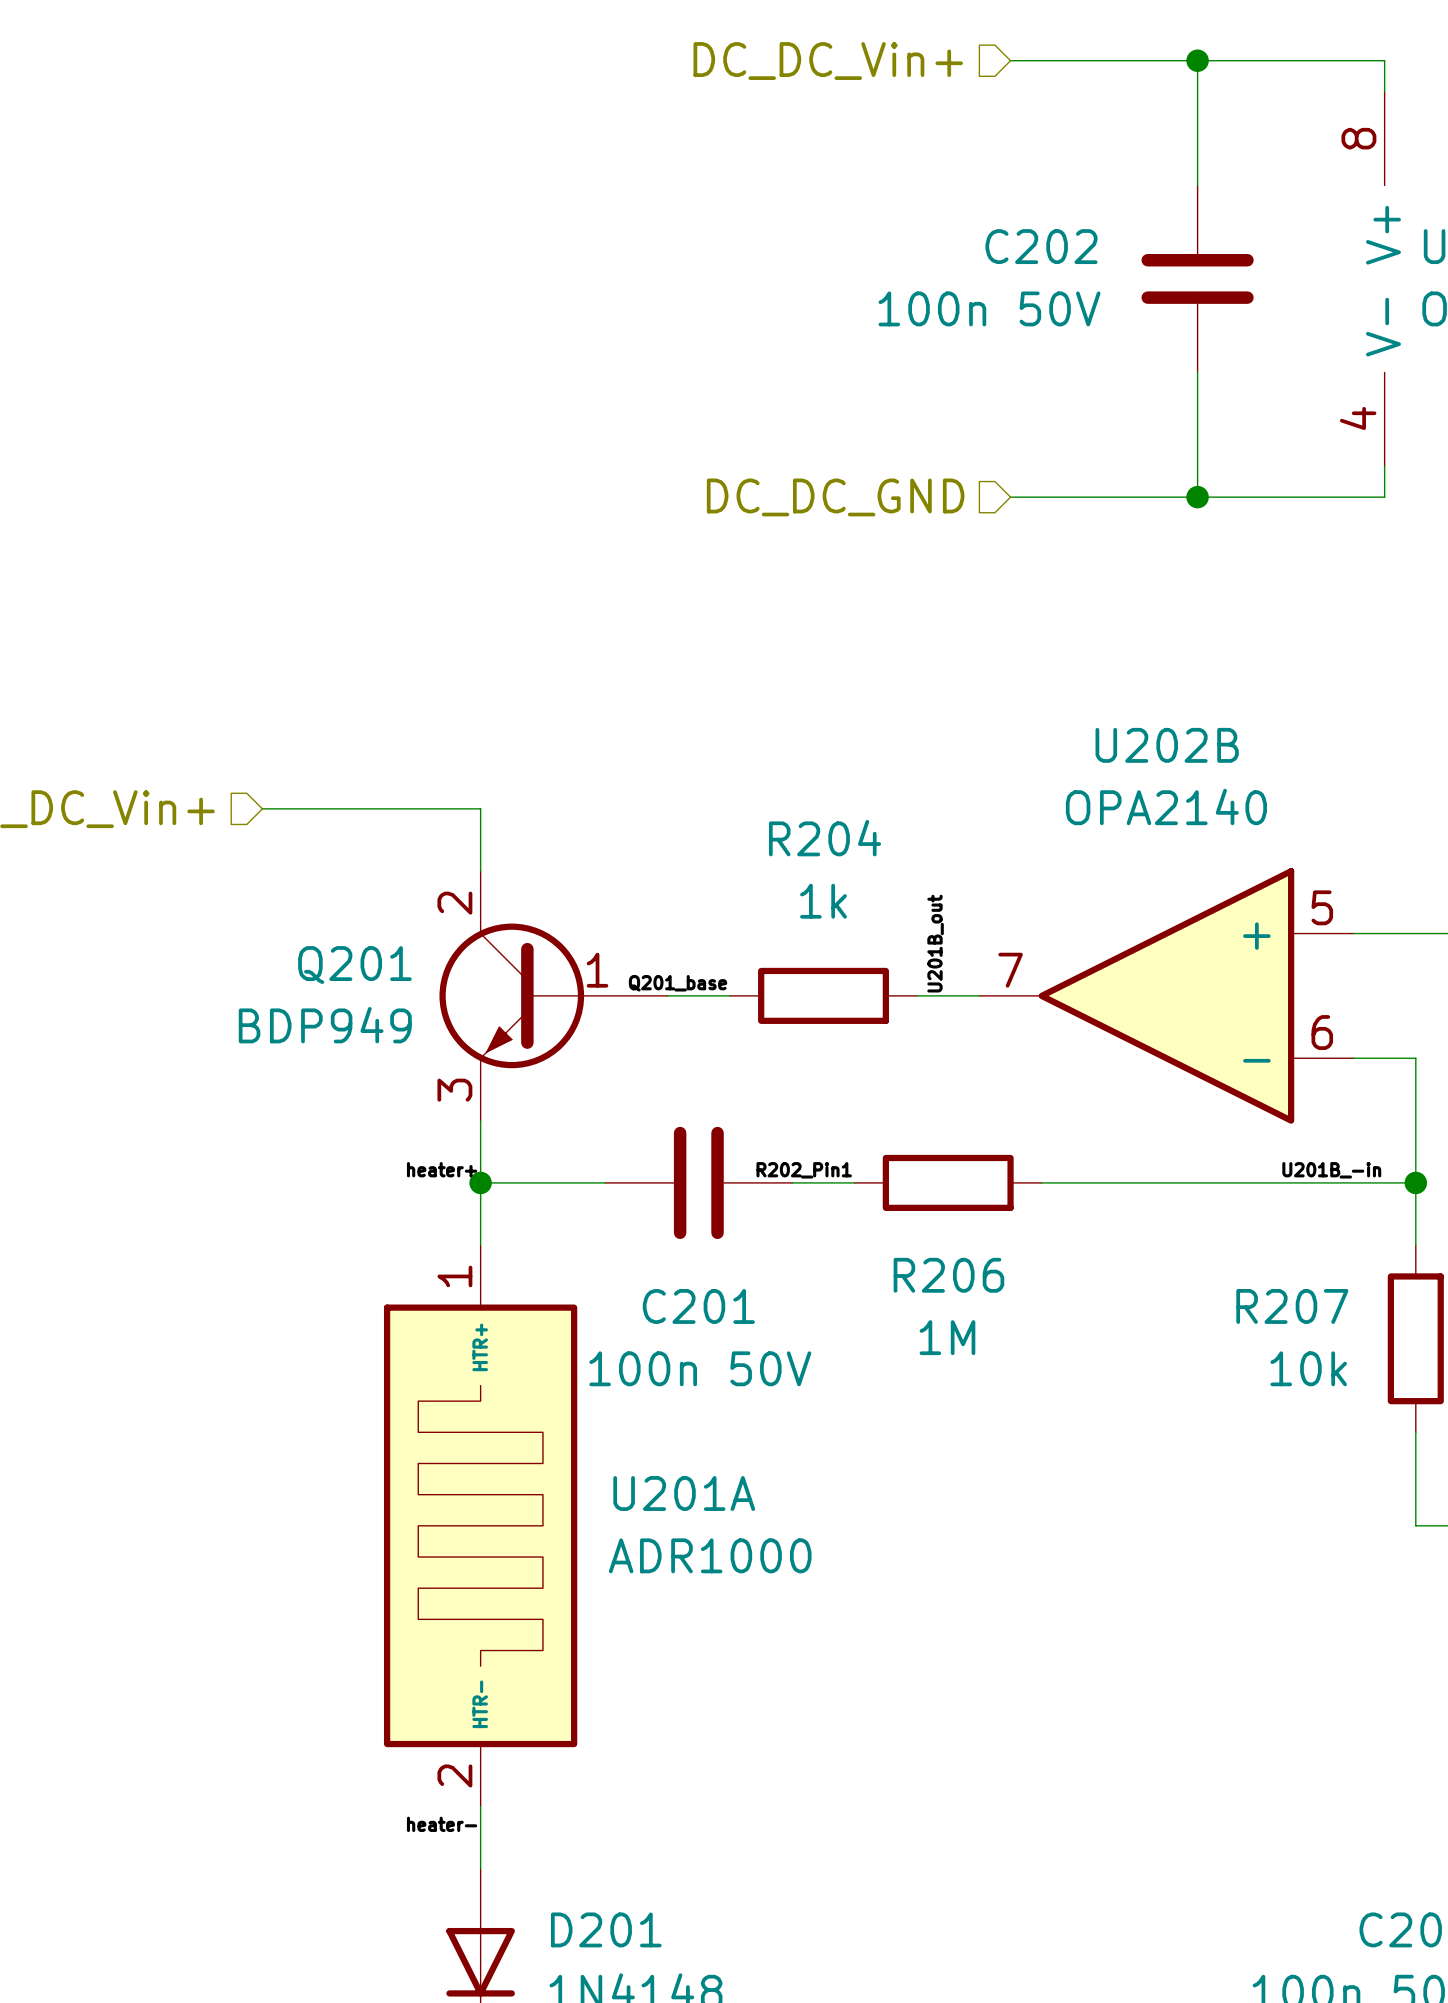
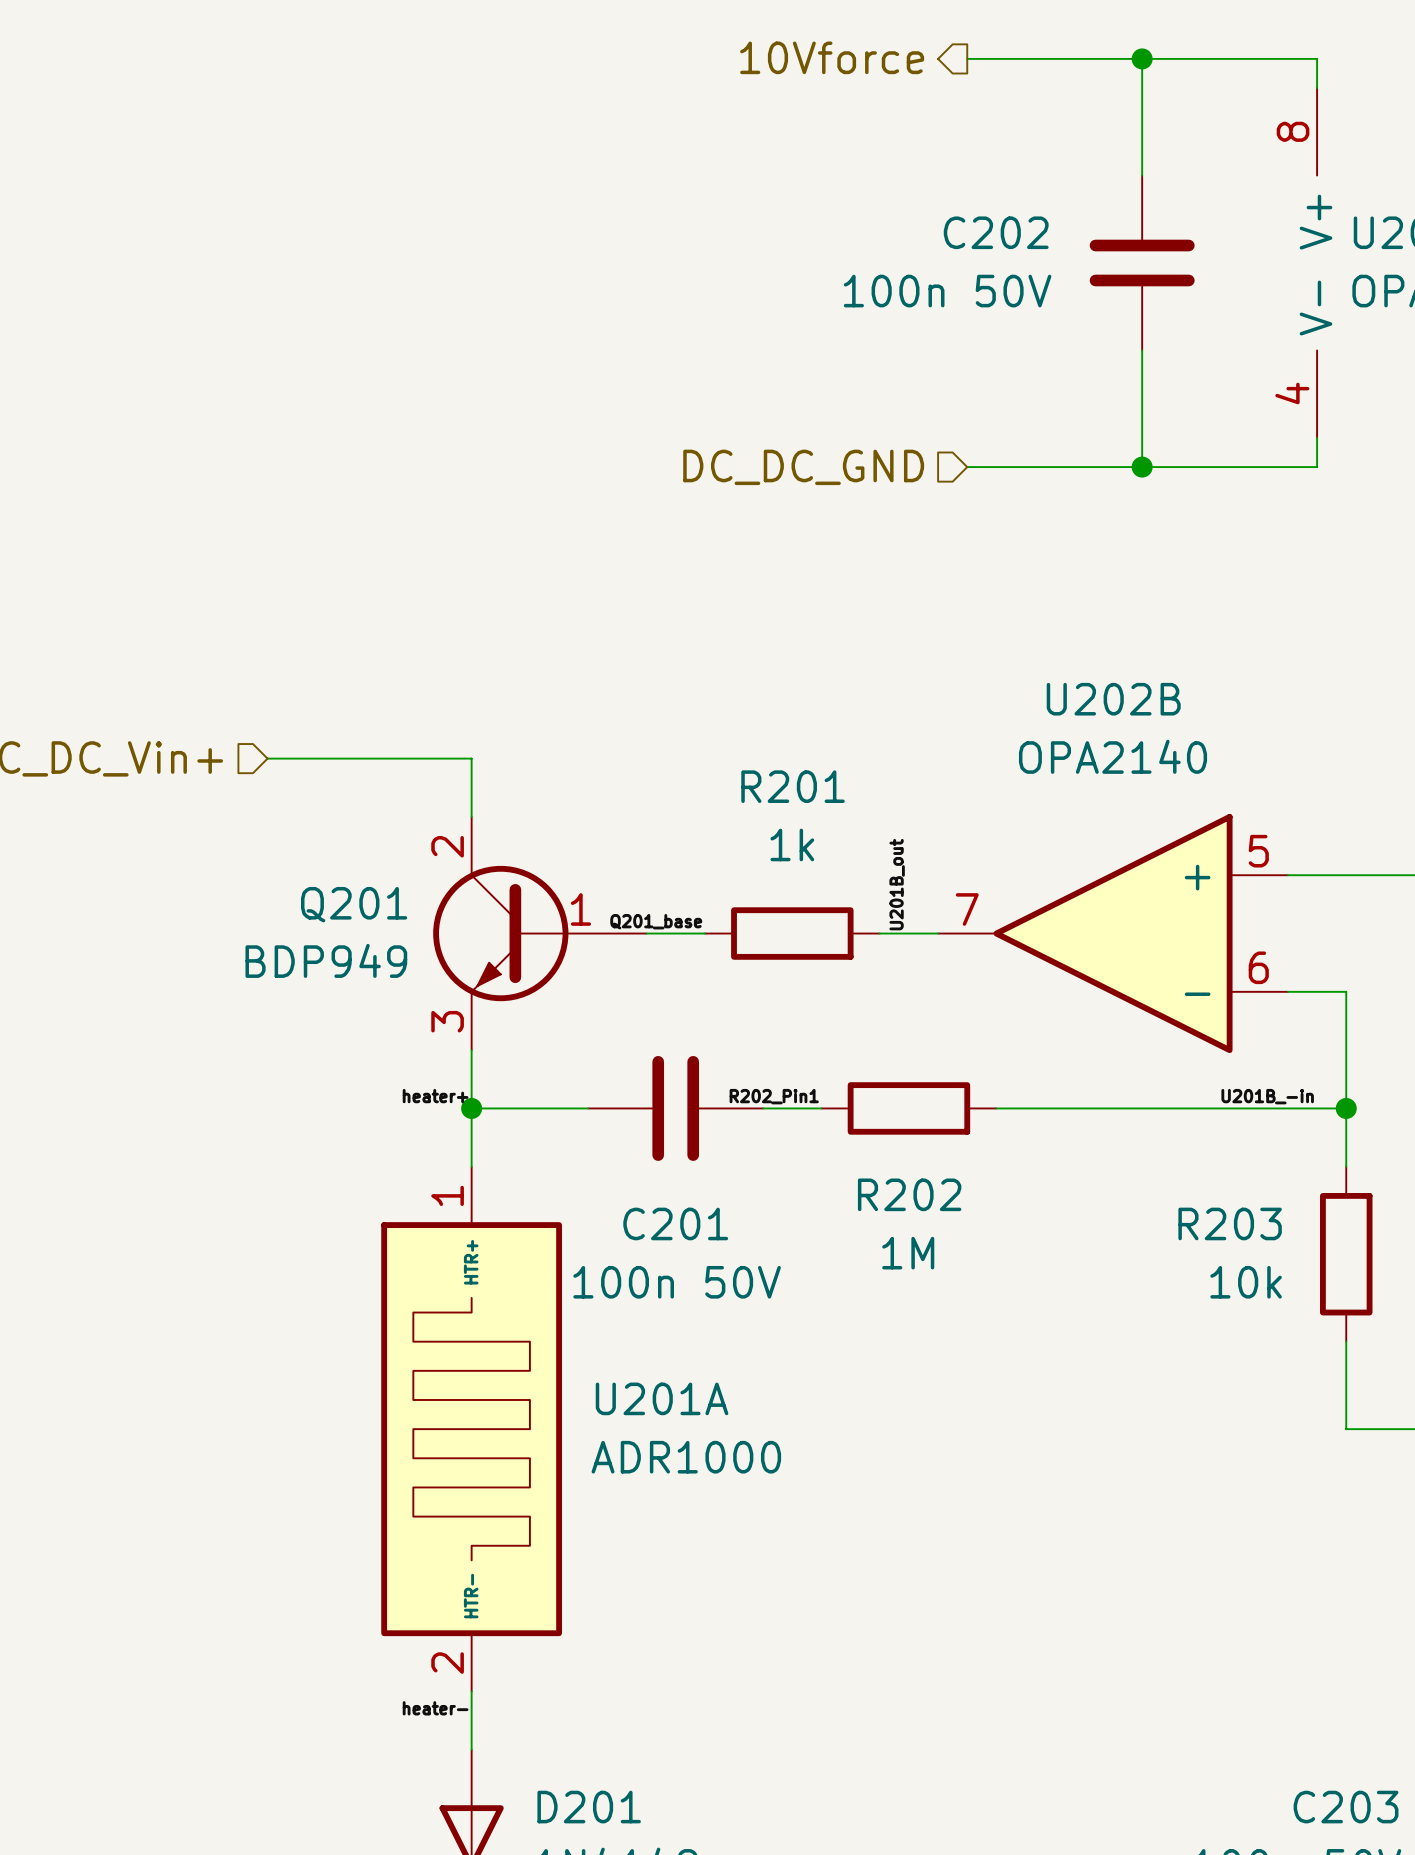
hierarchical label shape: input (828, 61) -> output (832, 57)
hierarchical label: DC_DC_Vin+ (828, 61) -> 10Vforce (832, 57)
R204 name: R204 (825, 838) -> R201 (793, 786)
R206 name: R206 (948, 1275) -> R202 (909, 1194)
R207 name: R207 (1292, 1306) -> R203 (1230, 1223)

